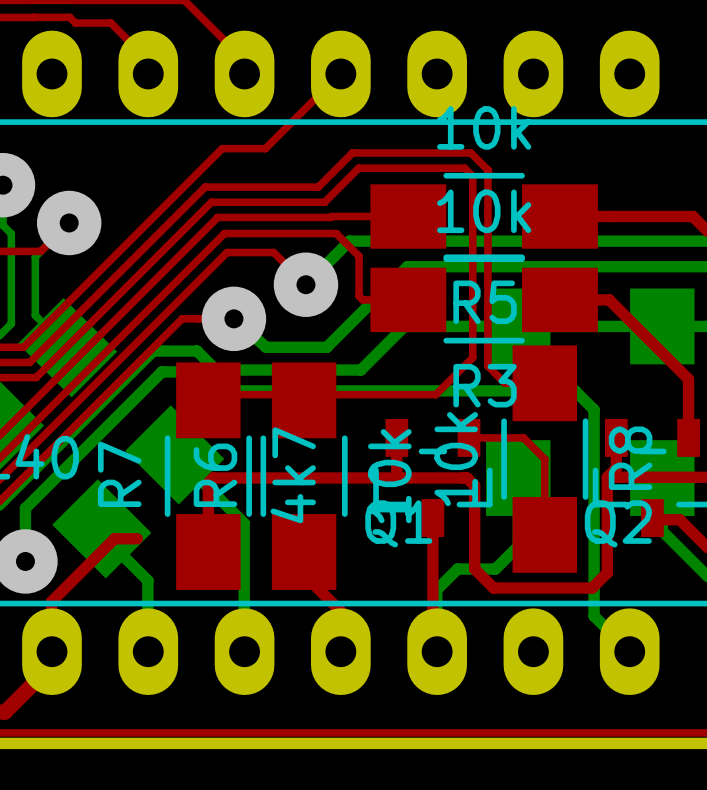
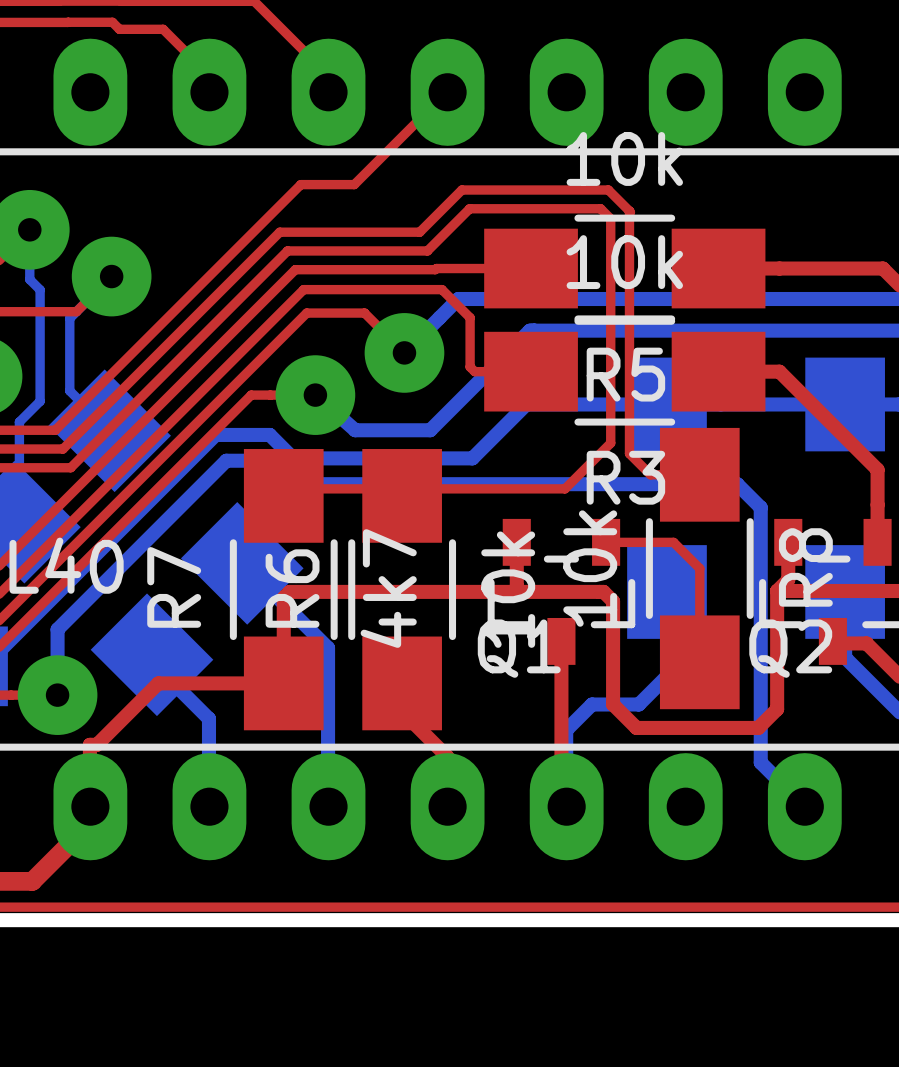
top track: (137, 538) (114, 538) (51, 601) -> (283, 683) (158, 683) (96, 744) (89, 744)

